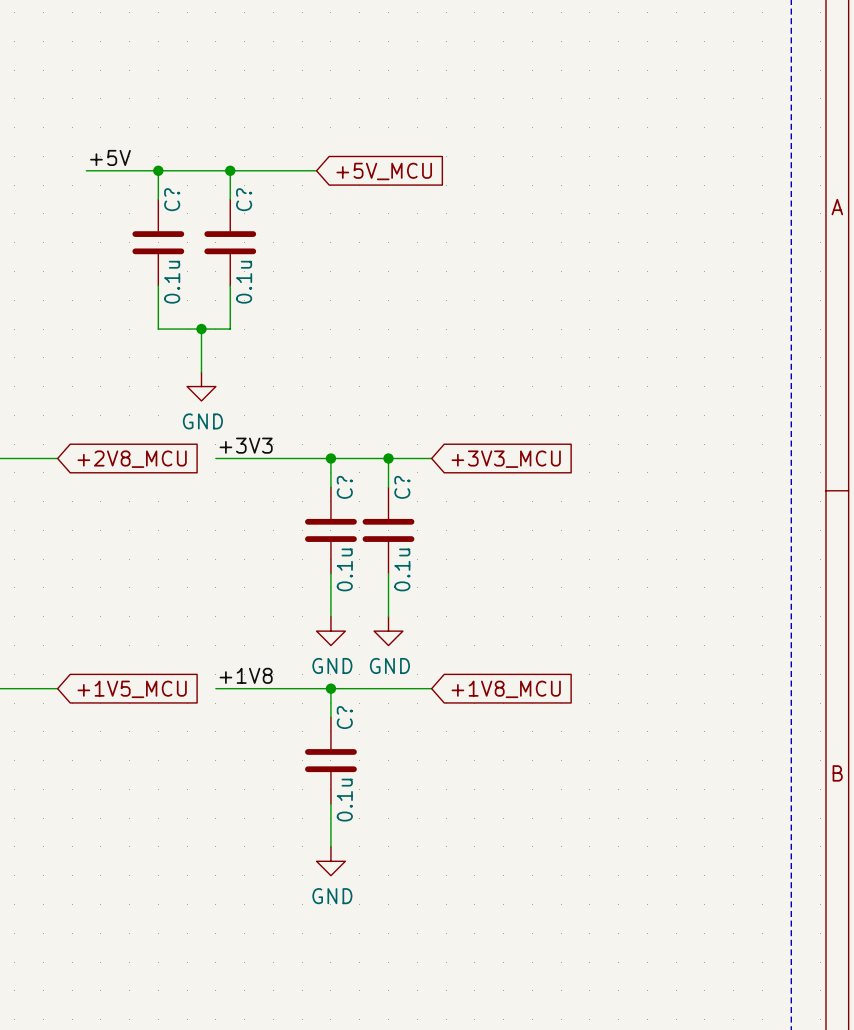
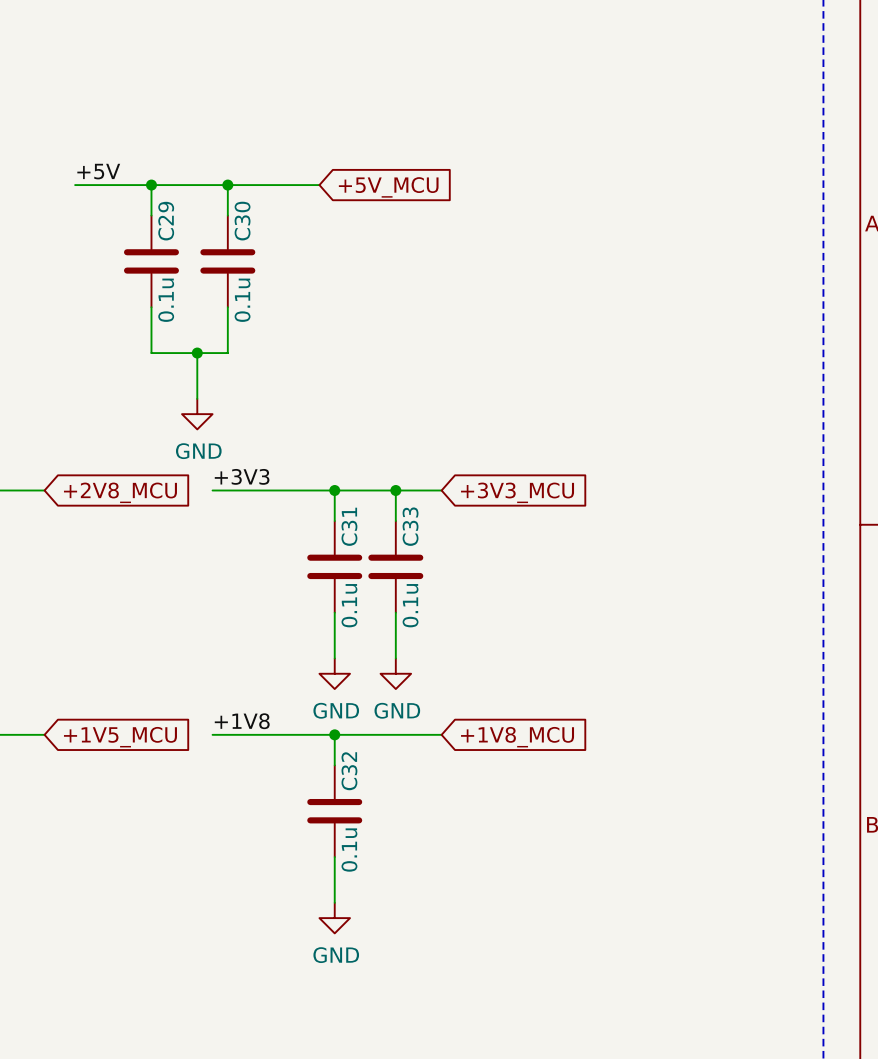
C? name: C? (172, 199) -> C29 (166, 221)
C? name: C? (244, 199) -> C30 (242, 221)
C? name: C? (344, 487) -> C31 (349, 526)
C? name: C? (402, 487) -> C33 (410, 526)
C? name: C? (344, 717) -> C32 (349, 771)

